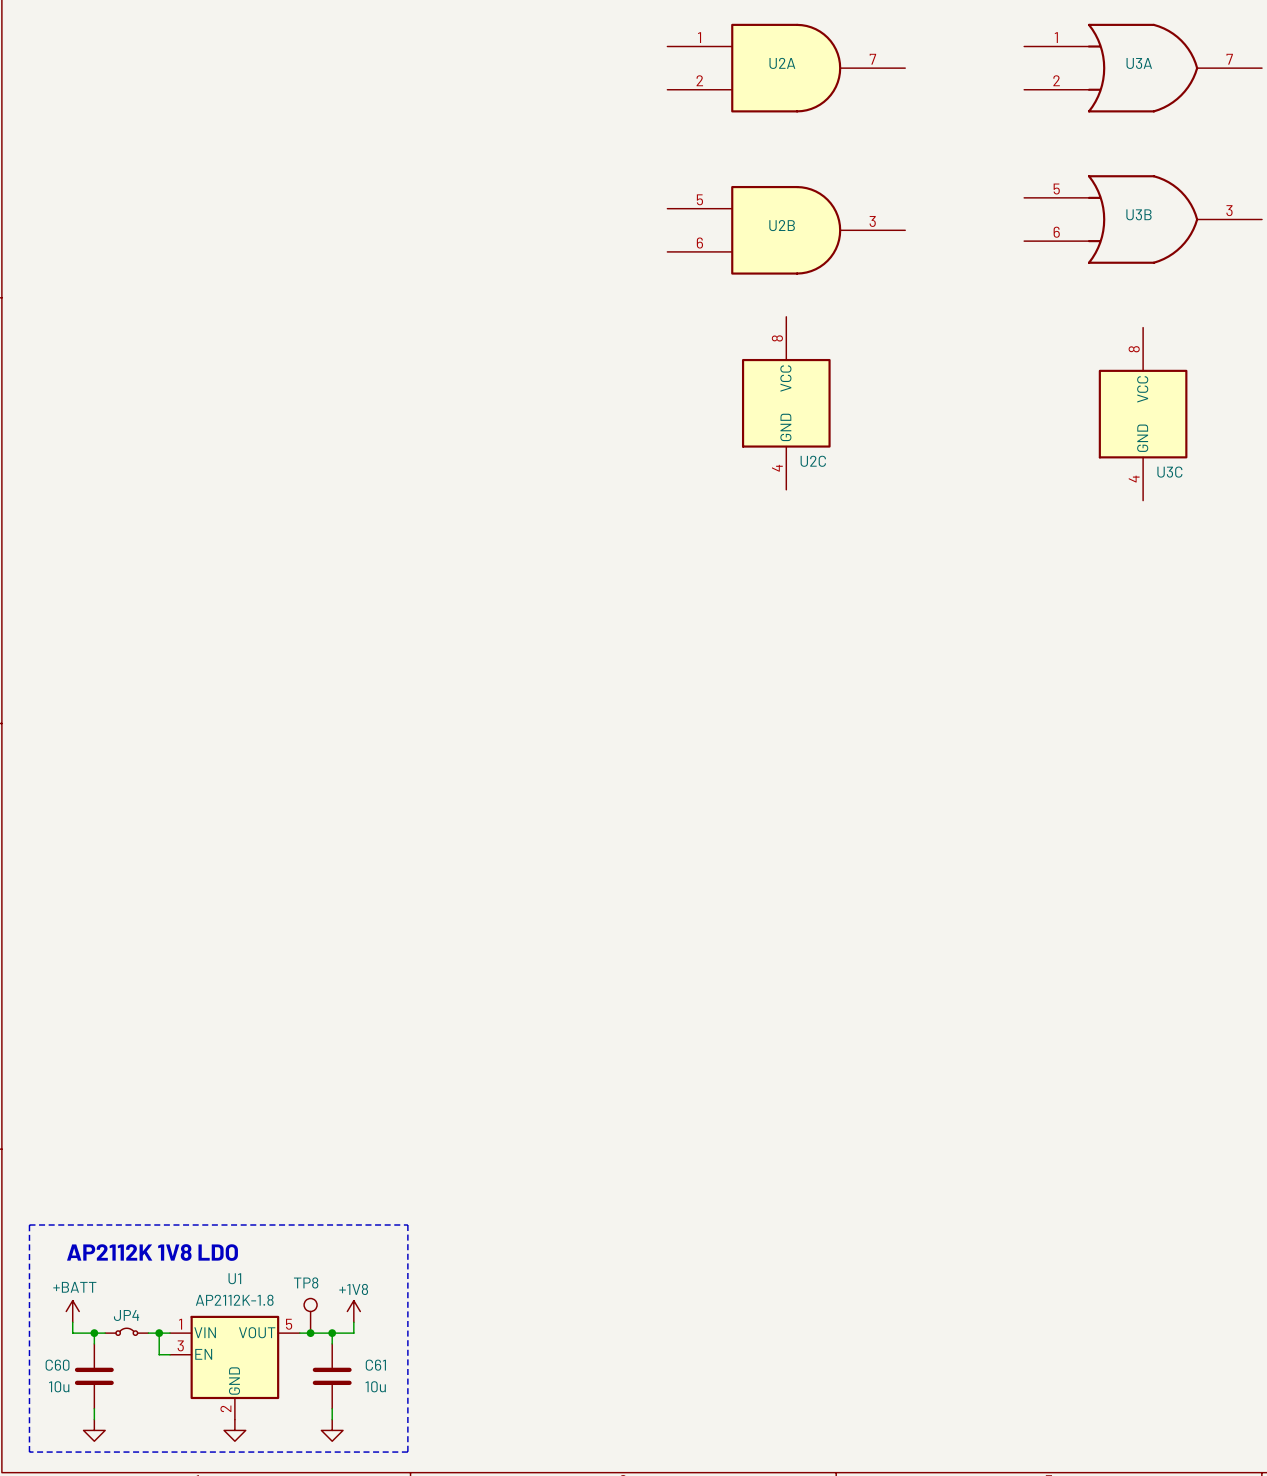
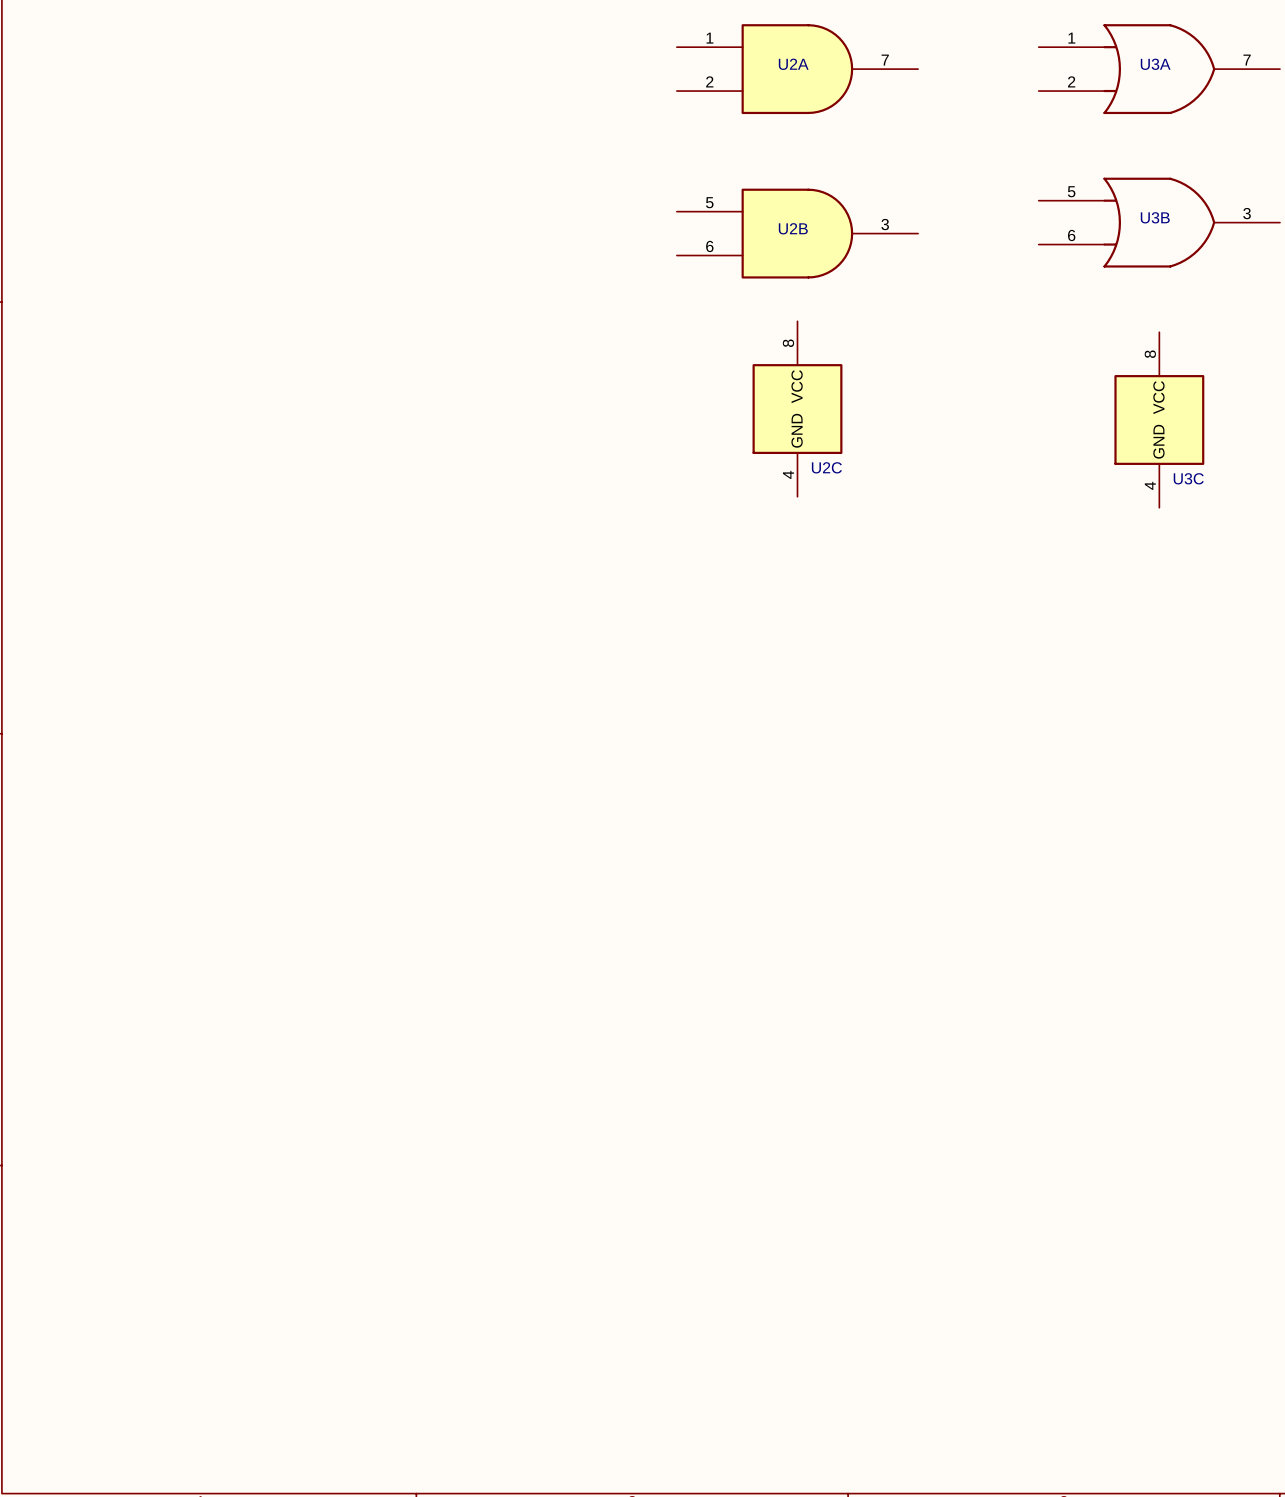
line: (29, 1225) (407, 1225) (407, 1452) (29, 1452) (29, 1225) -> none
text: AP2112K 1V8 LDO (152, 1252) -> none
power symbol: +BATT (72, 1311) -> none
power symbol: +1V8 (353, 1311) -> none
TP8: (310, 1315) -> none
wire: (72, 1322) (72, 1333) (105, 1333) -> none
wire: (353, 1322) (353, 1333) (299, 1333) -> none
JP4: (126, 1331) -> none
wire: (94, 1333) (94, 1343) -> none
junction: (94, 1333) -> none
wire: (148, 1333) (170, 1333) -> none
wire: (159, 1333) (159, 1354) (170, 1354) -> none
junction: (159, 1333) -> none
junction: (310, 1333) -> none
wire: (332, 1333) (332, 1343) -> none
junction: (332, 1333) -> none
U1: AP2112K-1.8 (234, 1367) -> none
C60: 10u (94, 1376) -> none
C61: 10u (332, 1376) -> none
wire: (94, 1408) (94, 1419) -> none
wire: (332, 1408) (332, 1419) -> none
power symbol: (94, 1430) -> none
power symbol: (234, 1430) -> none
power symbol: (332, 1430) -> none

